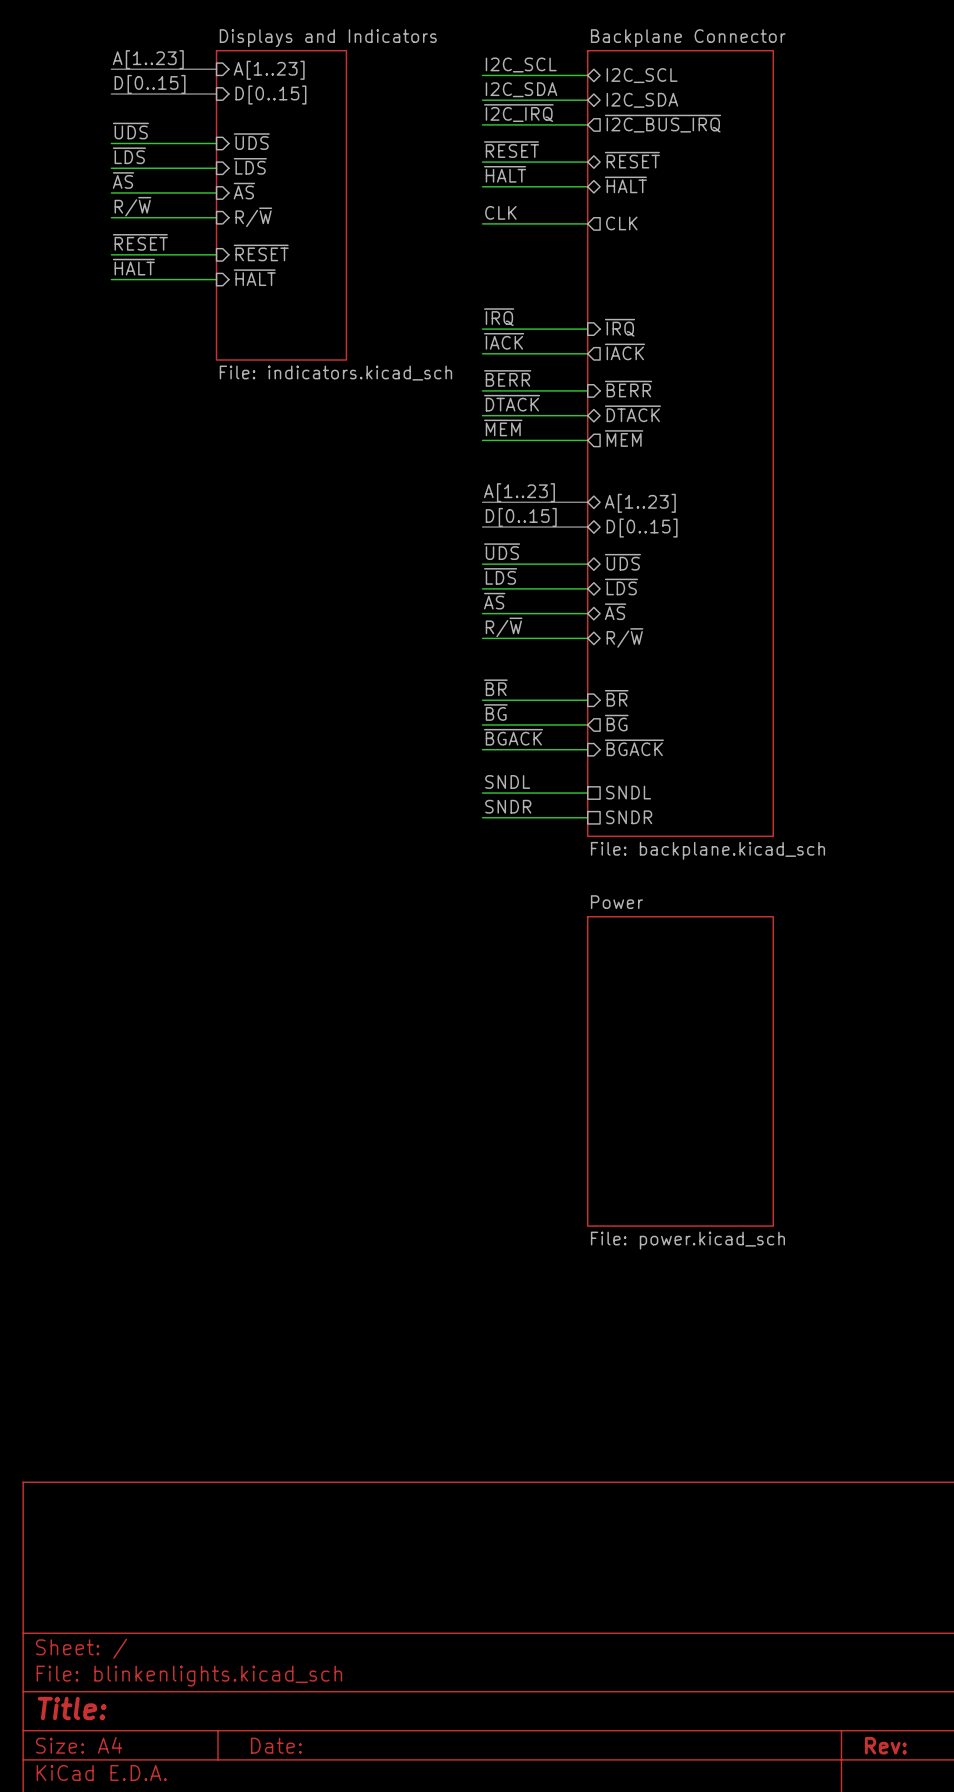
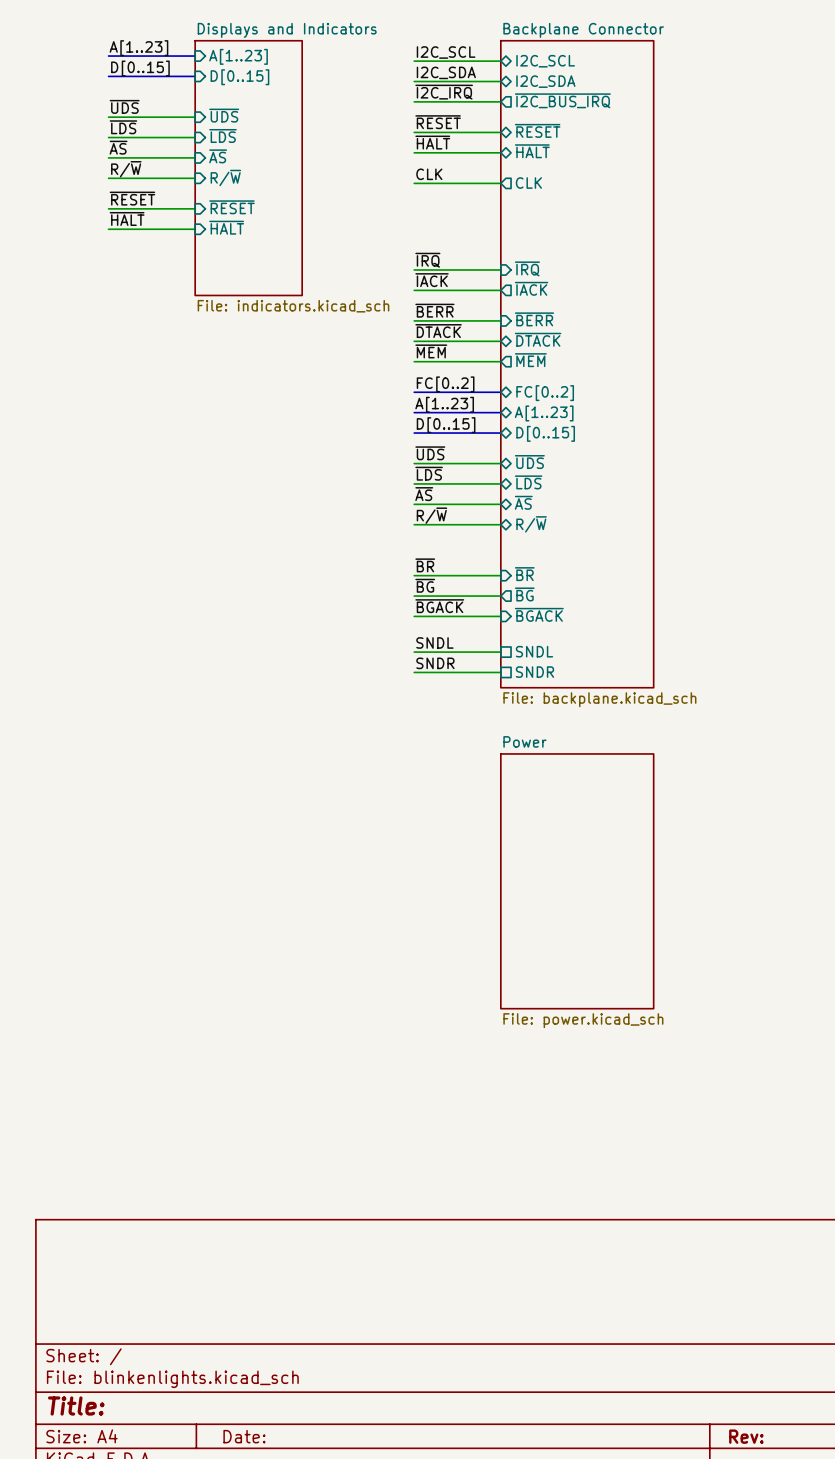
label: none -> FC[0..2] (445, 384)
bus: none -> (414, 392) (500, 392)
sheet pin: none -> FC[0..2] (545, 393)

